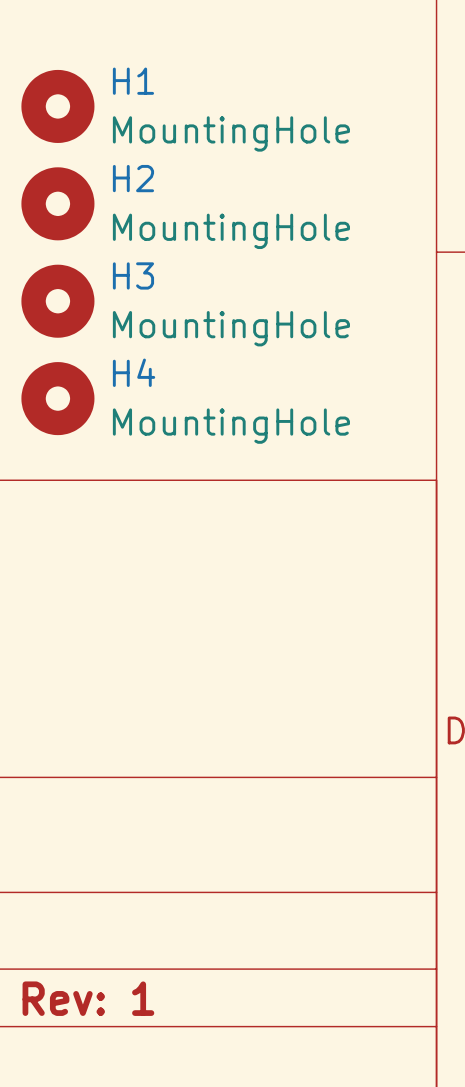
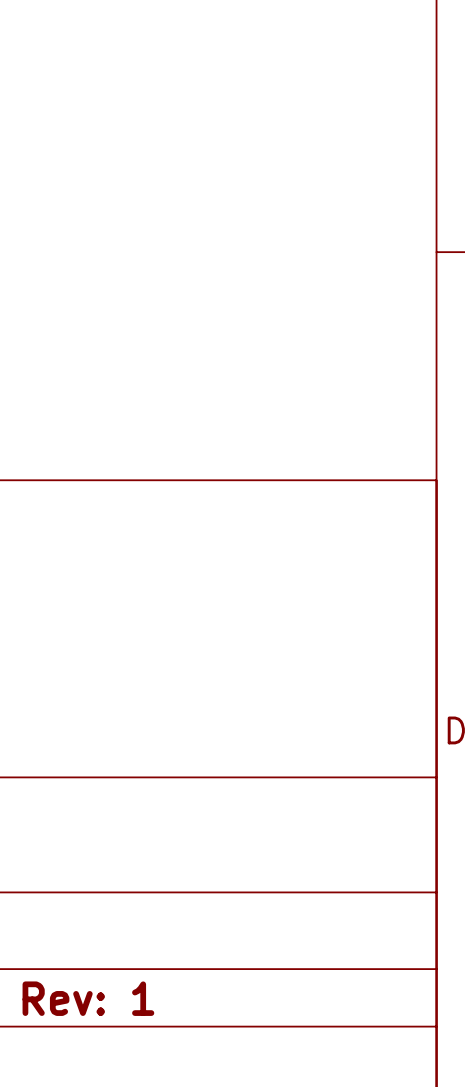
H1: MountingHole (57, 106) -> none
H2: MountingHole (57, 203) -> none
H3: MountingHole (57, 301) -> none
H4: MountingHole (57, 398) -> none

